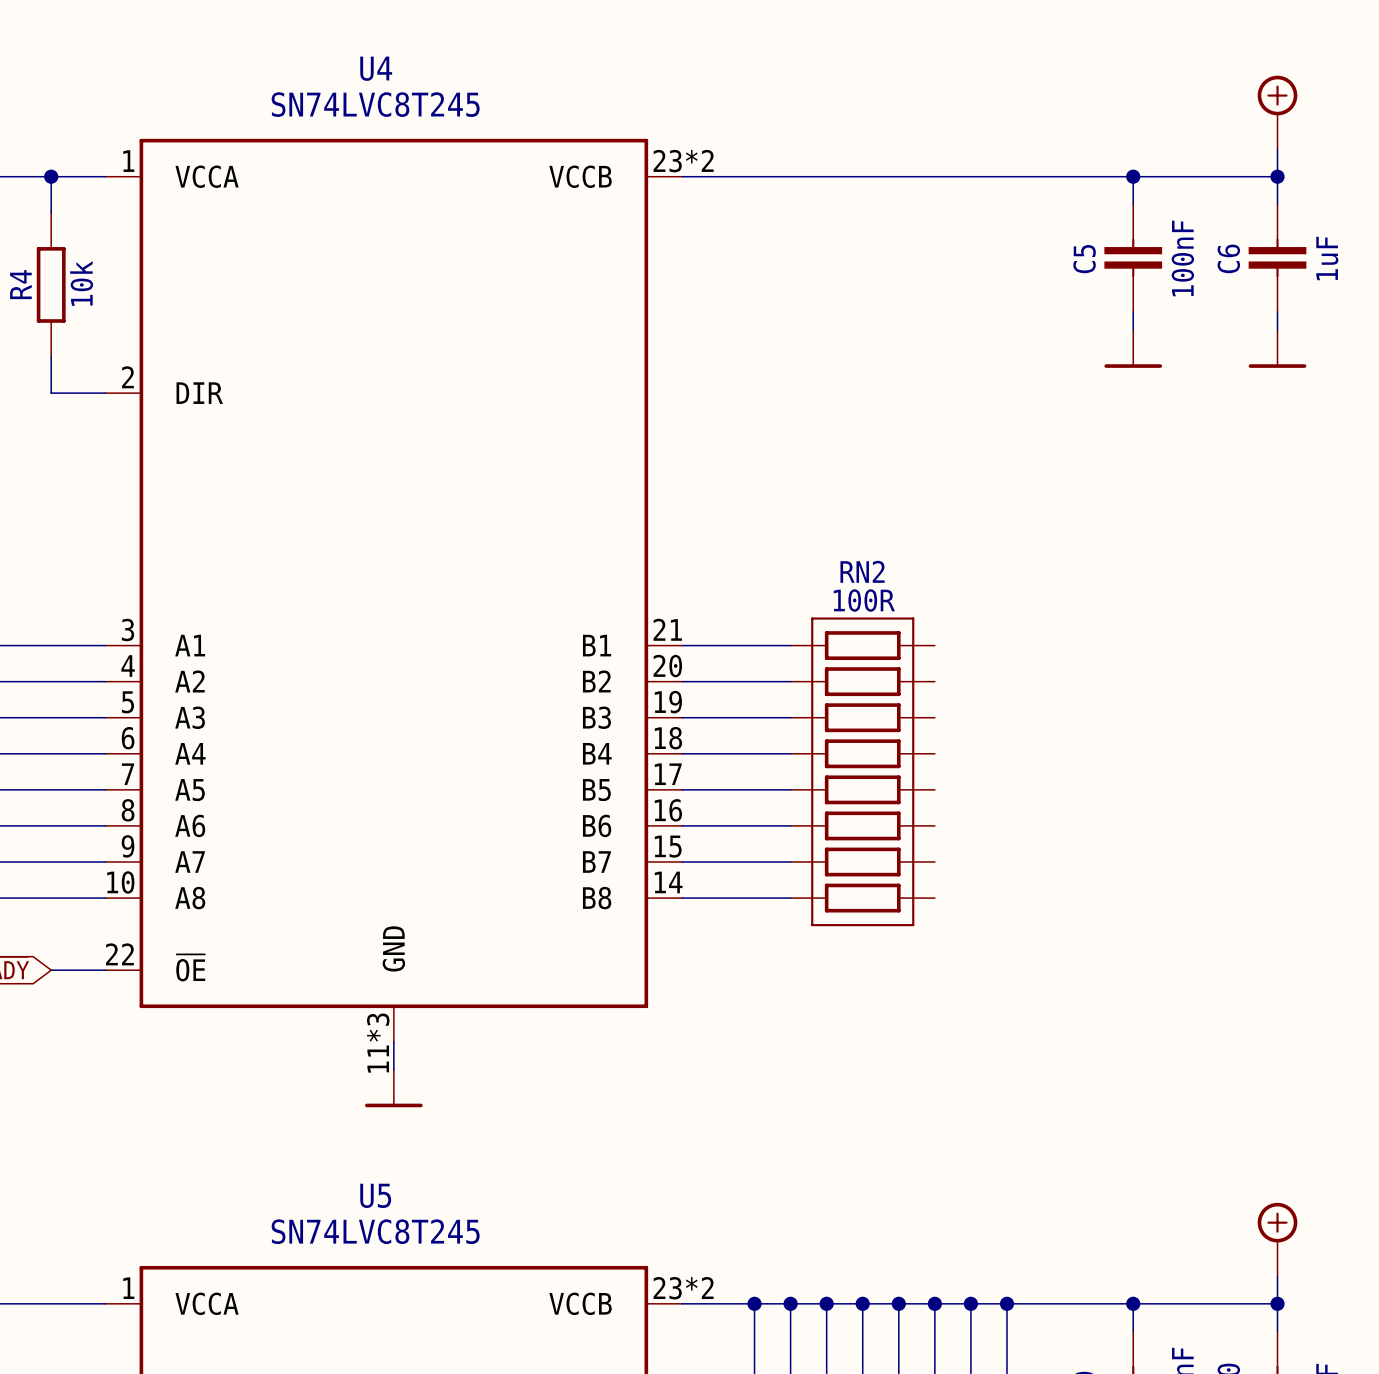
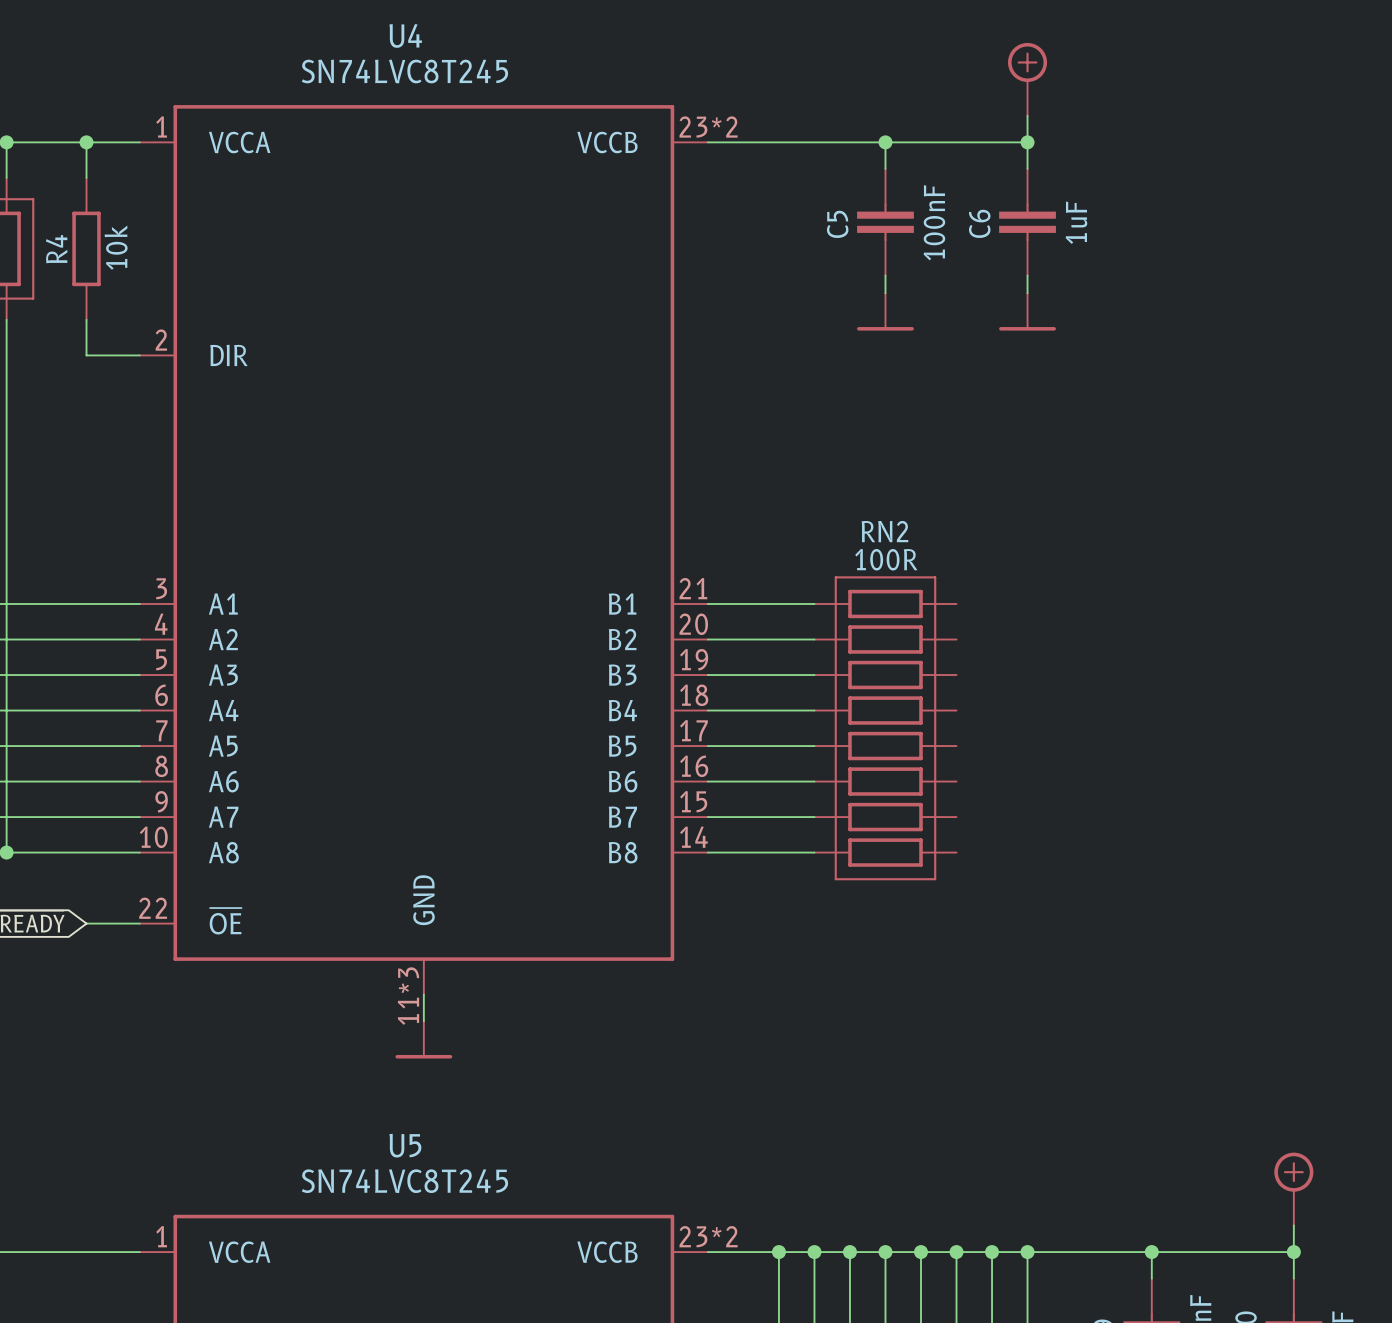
power symbol position: (1277, 112) -> (1027, 79)
wire: (1277, 149) (1277, 203) -> (1027, 115) (1027, 169)
junction: none -> (885, 142)
wire: (1007, 176) (1277, 176) -> none
junction: none -> (1027, 142)
wire: (1133, 176) (1133, 203) -> (885, 142) (885, 169)
junction: (1133, 176) -> none
junction: (1277, 176) -> none
C5 position: (1133, 257) -> (885, 222)
C6 position: (1277, 257) -> (1027, 222)
wire: (1133, 311) (1133, 330) -> (885, 275) (885, 293)
wire: (1277, 311) (1277, 330) -> (1027, 275) (1027, 293)
power symbol: none -> (885, 311)
power symbol position: (1133, 348) -> (1027, 311)
power symbol: (1277, 348) -> none

